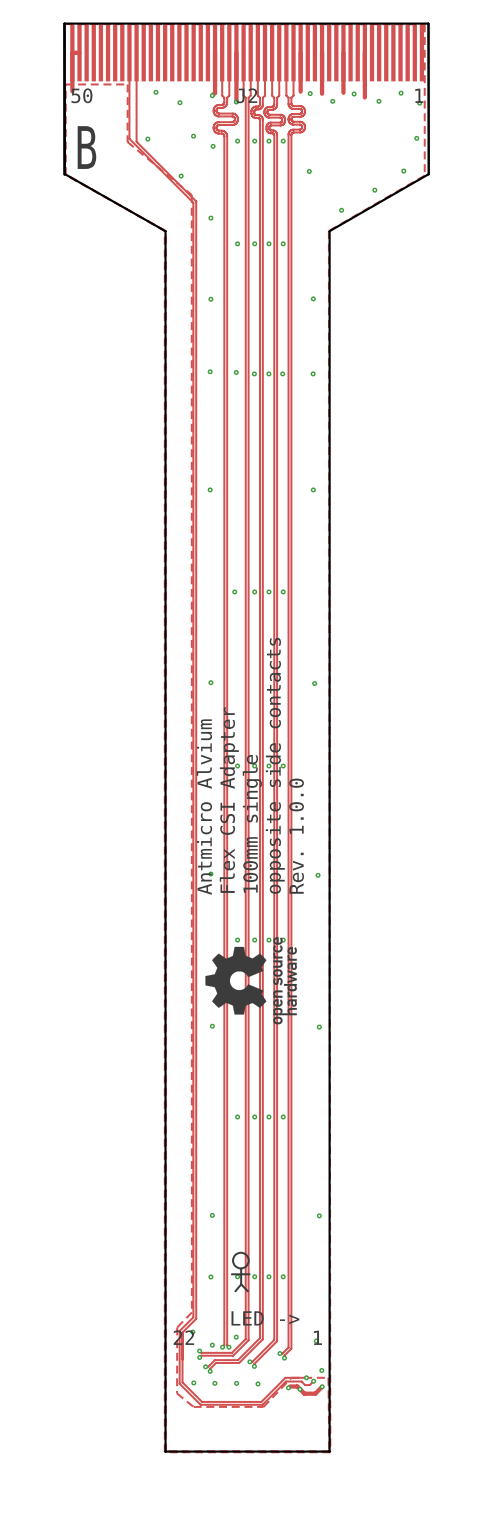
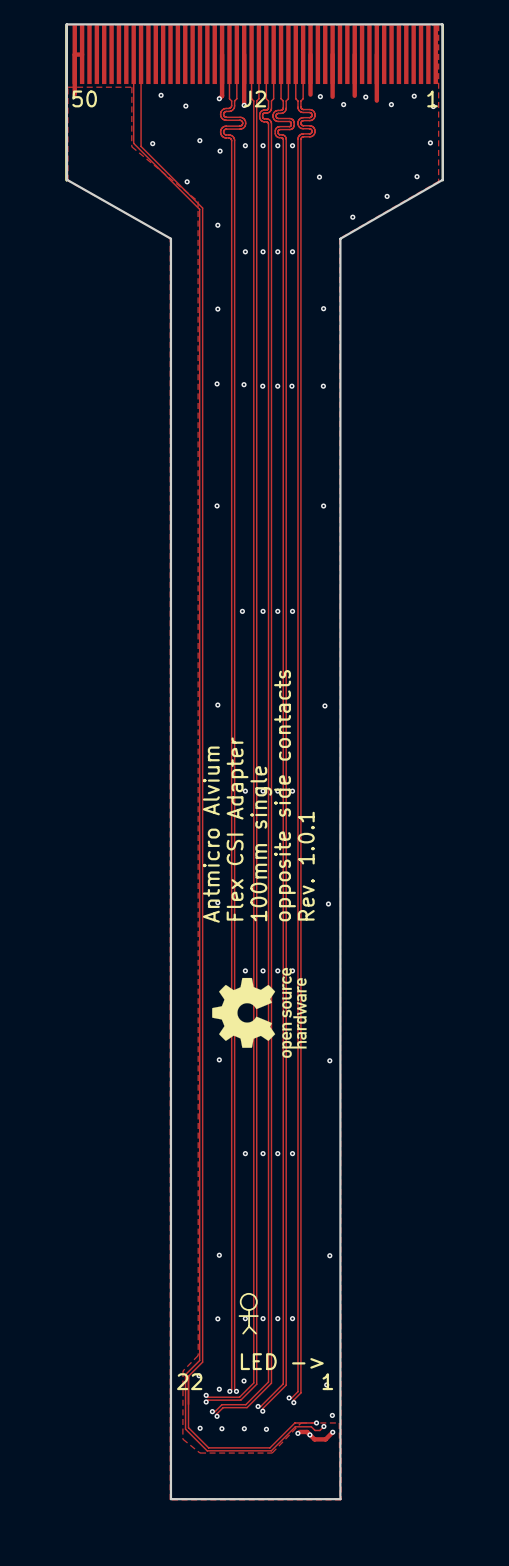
text: B (86, 147) -> none
text: Rev. 1.0.0 (296, 836) -> Rev. 1.0.1 (306, 866)

